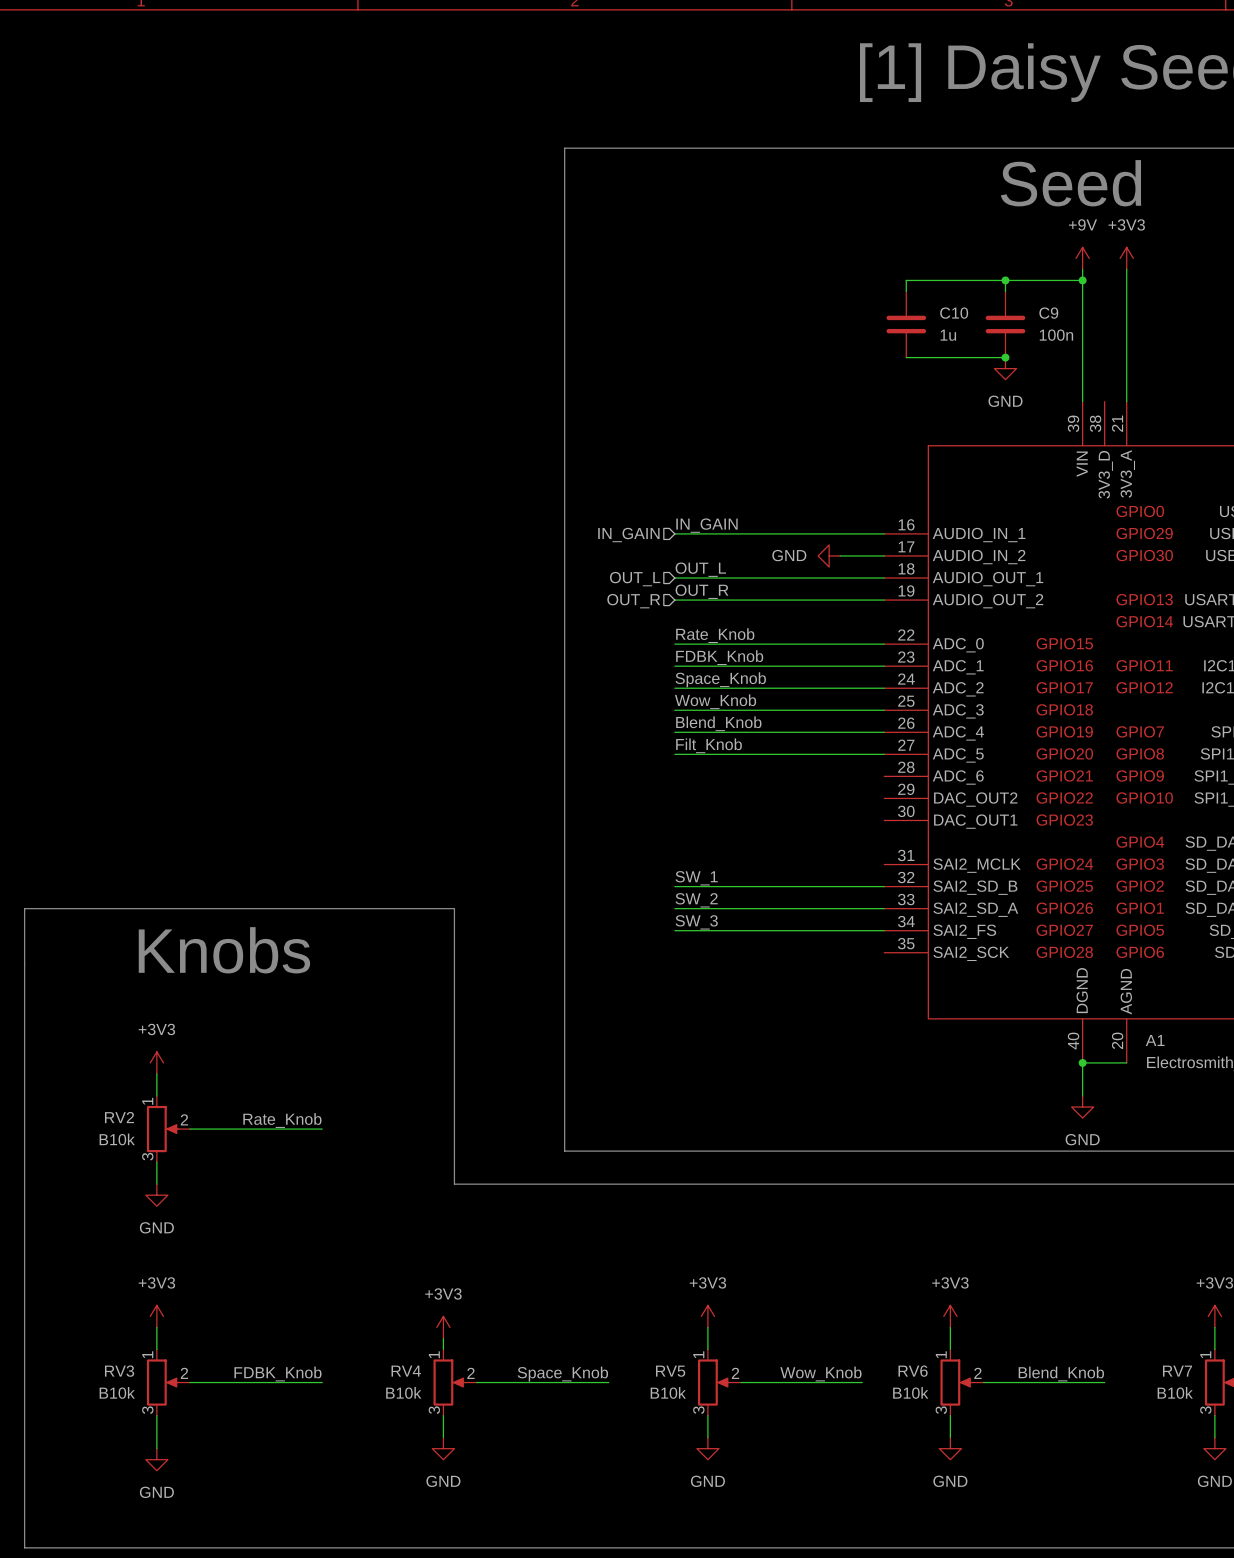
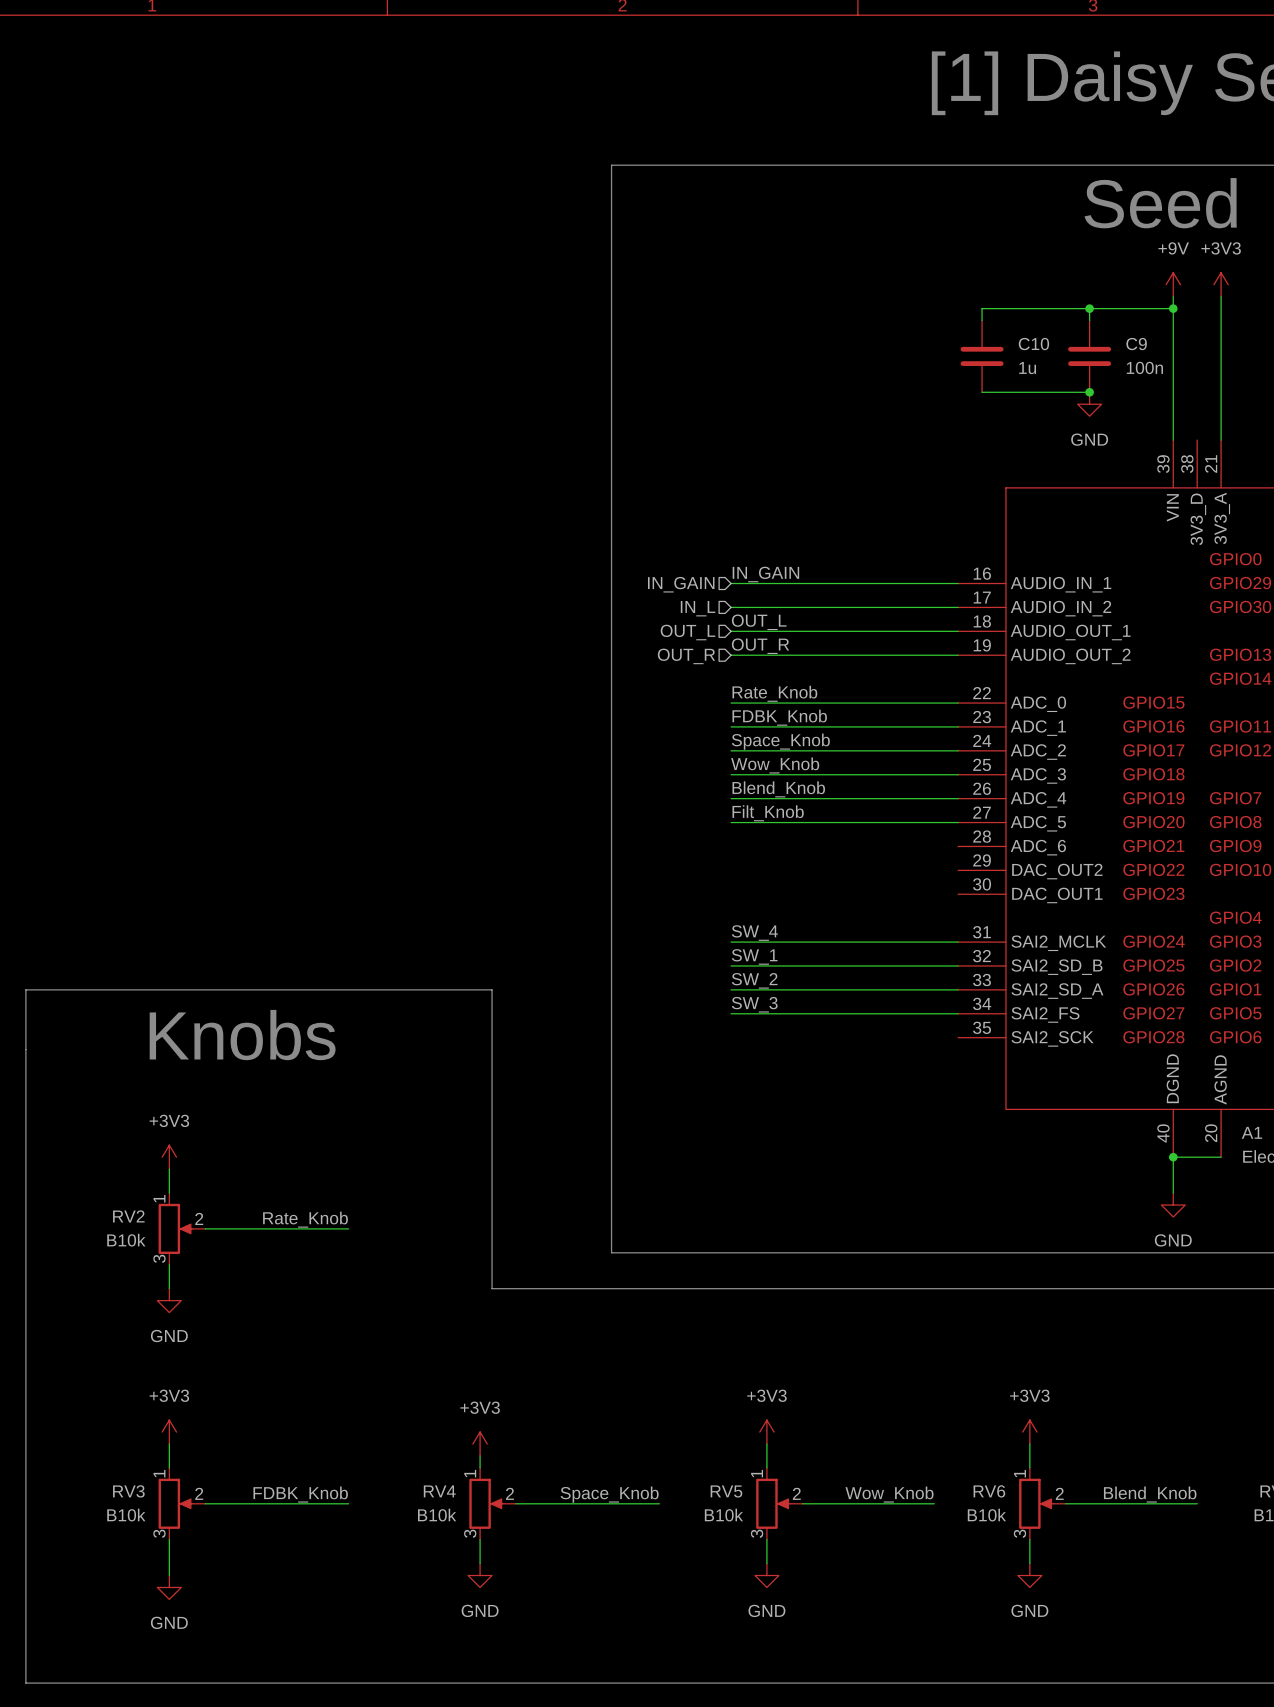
wire: none -> (731, 607) (910, 607)
power symbol: GND (829, 555) -> none
hierarchical label: none -> IN_L (698, 608)
label: none -> SW_4 (754, 933)
wire: none -> (731, 942) (958, 942)

